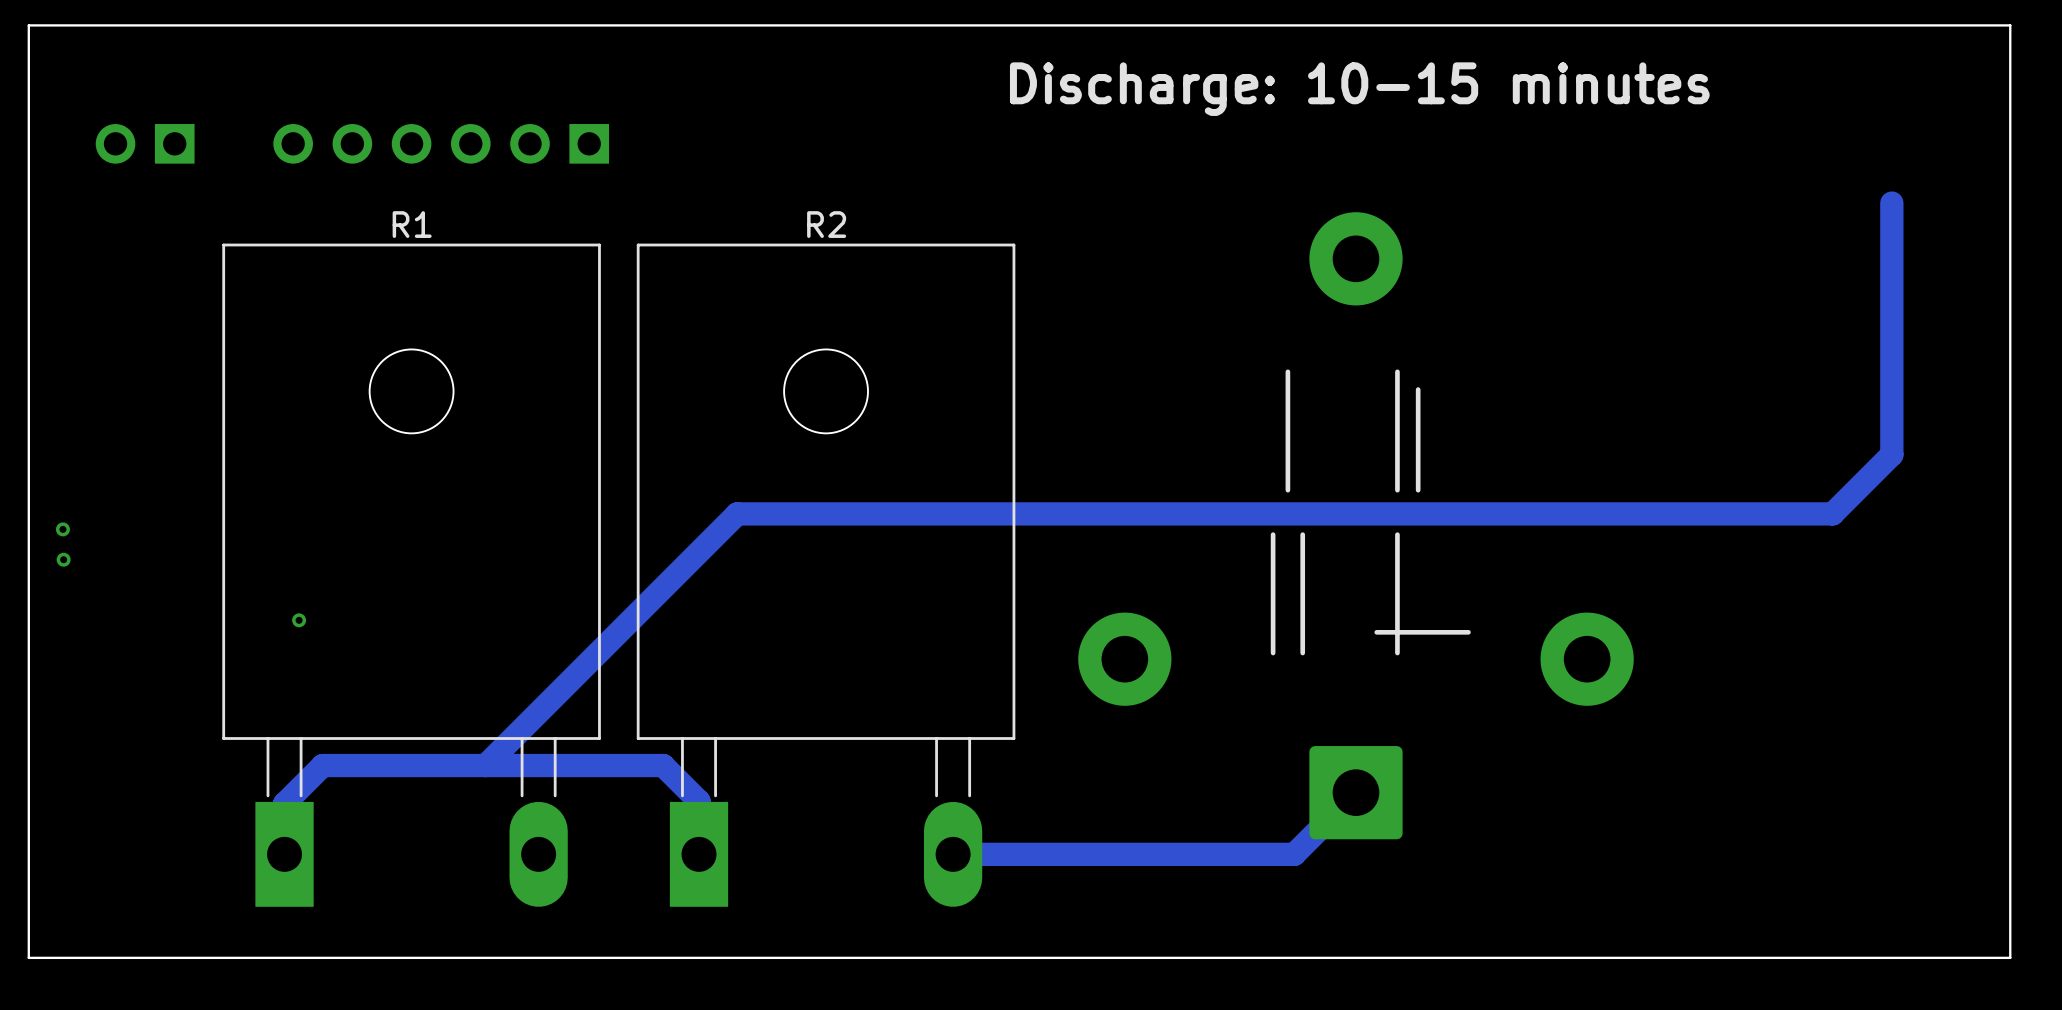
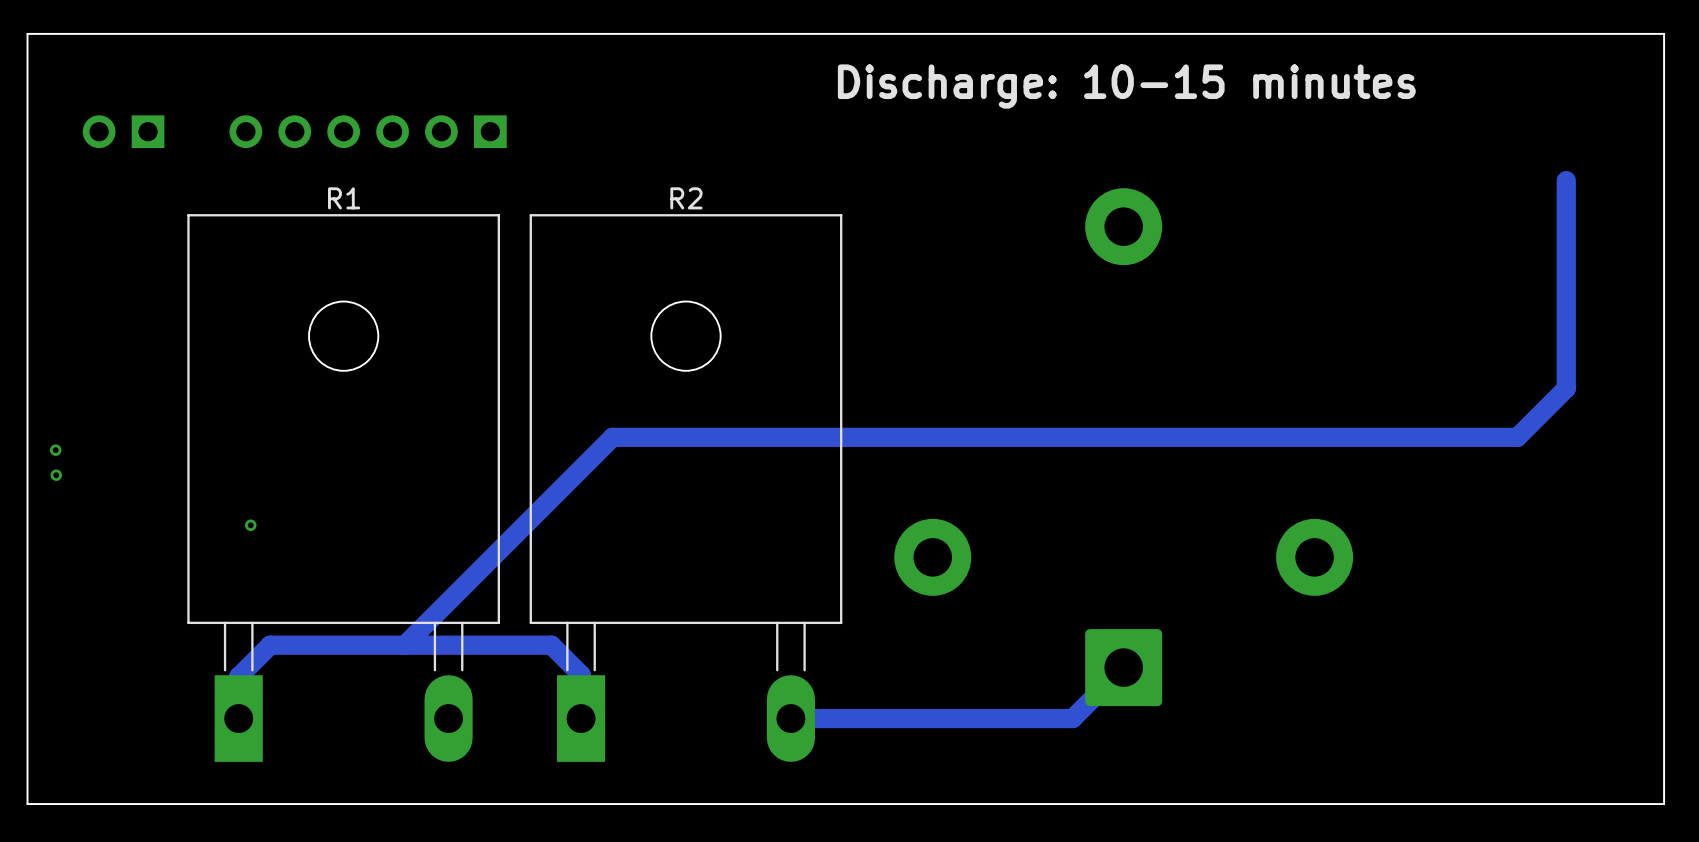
line: (1287, 371) (1287, 490) -> none
line: (1397, 371) (1397, 490) -> none
line: (1418, 389) (1418, 490) -> none
line: (1273, 534) (1273, 653) -> none
line: (1302, 534) (1302, 653) -> none
line: (1397, 534) (1397, 653) -> none
line: (1468, 632) (1376, 632) -> none

